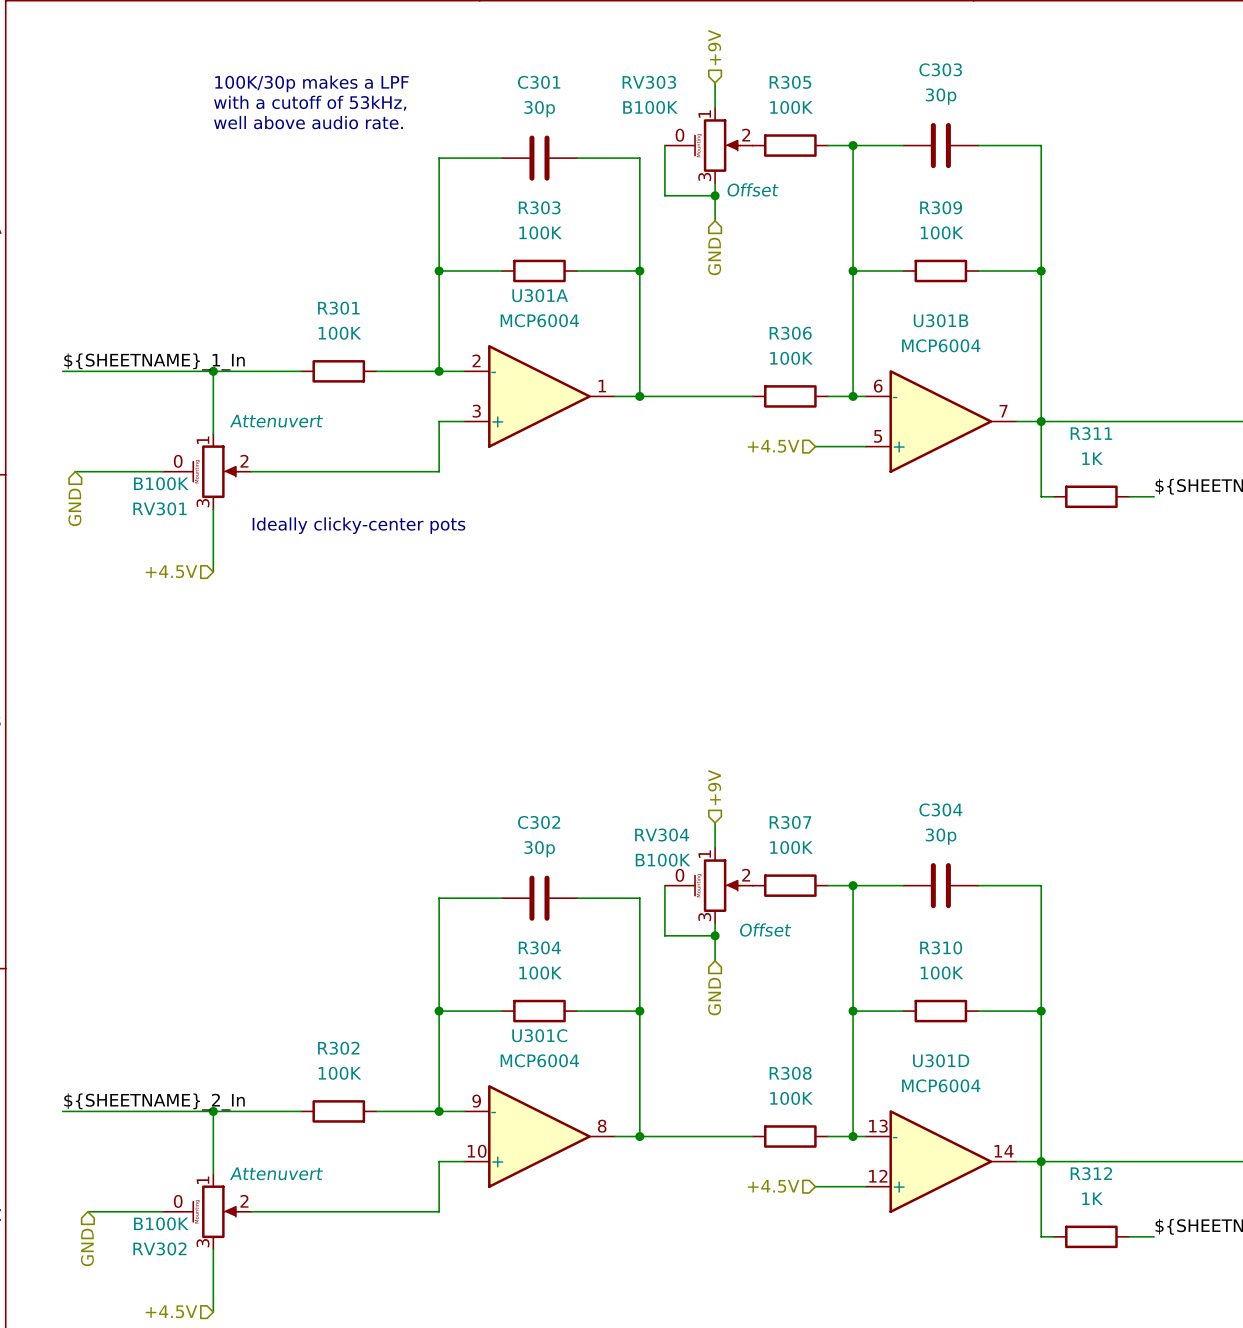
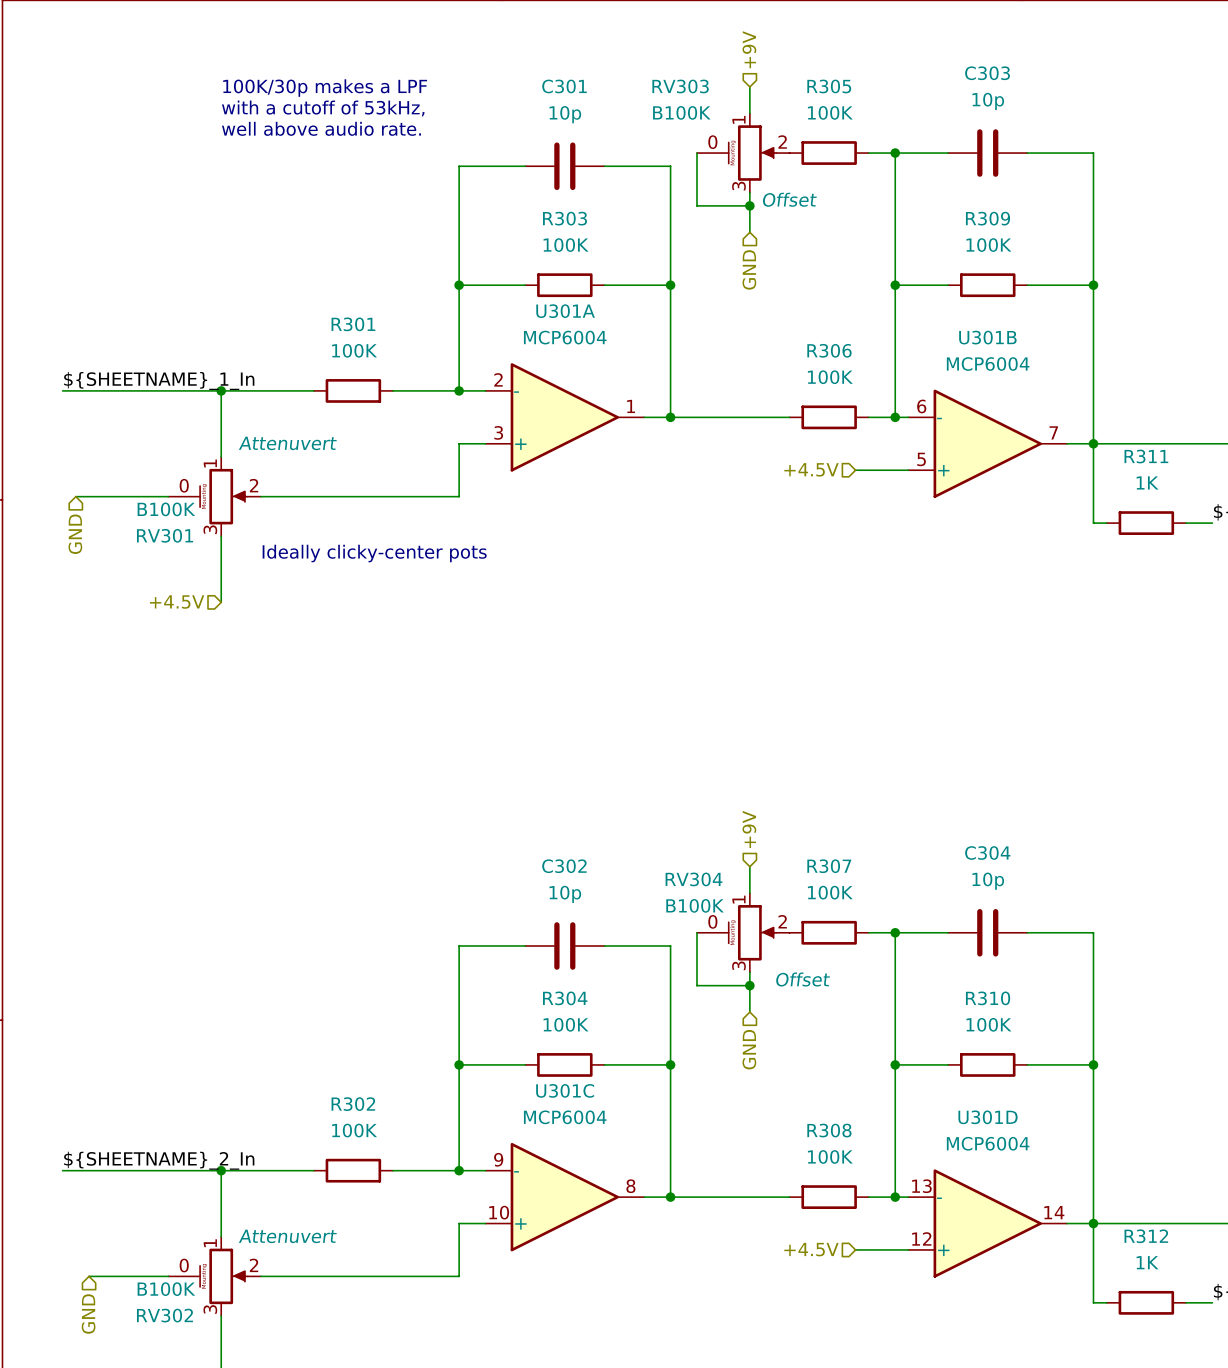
C303 value: 30p (941, 96) -> 10p (988, 101)
C301 value: 30p (539, 109) -> 10p (565, 114)
C304 value: 30p (941, 836) -> 10p (988, 881)
C302 value: 30p (539, 849) -> 10p (565, 894)

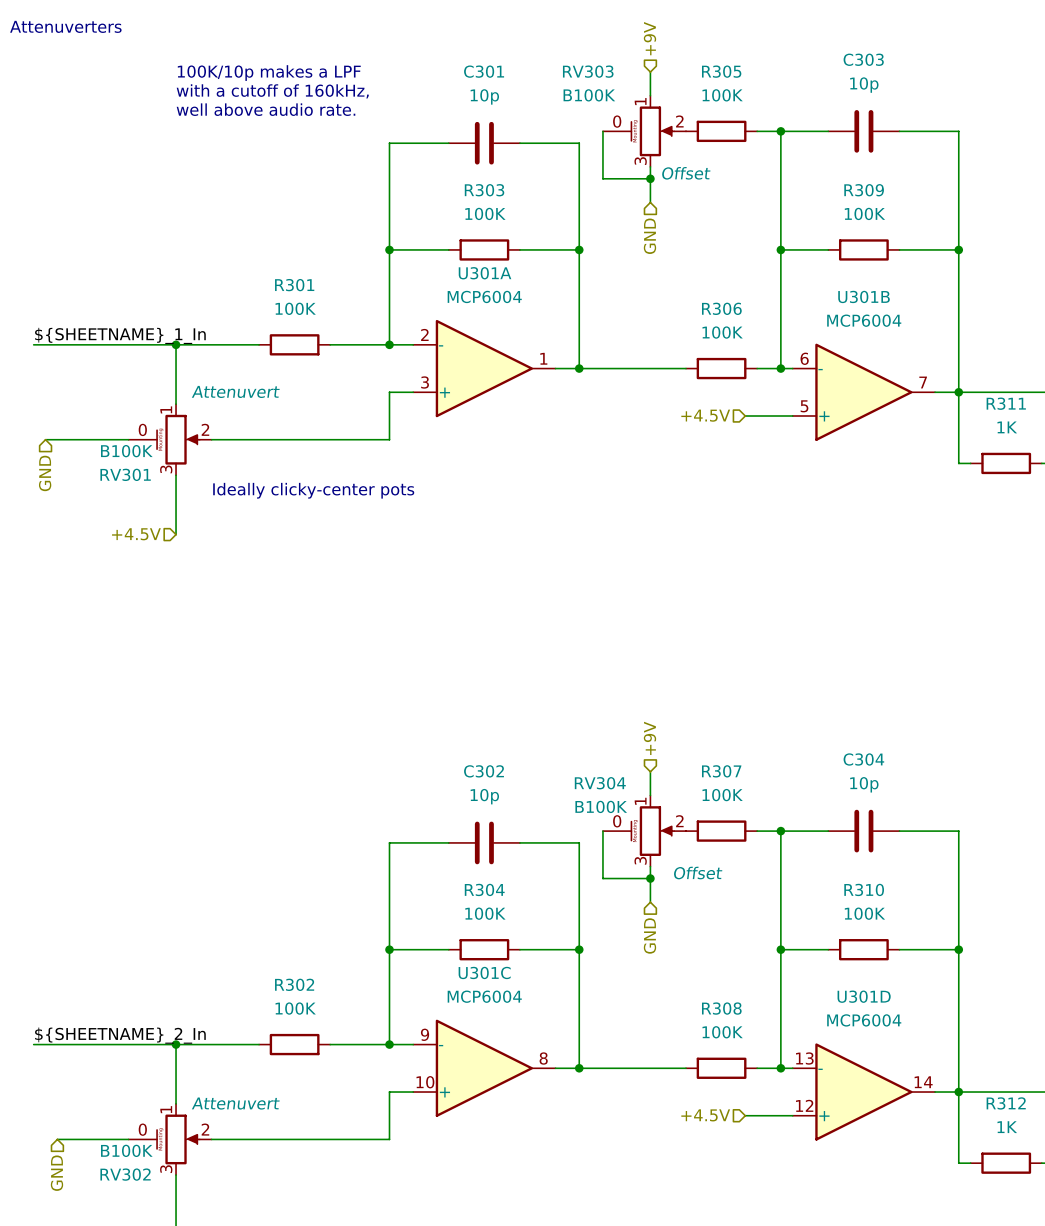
text: none -> Attenuverters (65, 26)
text: 100K/30p makes a LPF (325, 88) -> 100K/10p makes a LPF (269, 73)
text: with a cutoff of 53kHz, (323, 108) -> with a cutoff of 160kHz, (272, 91)

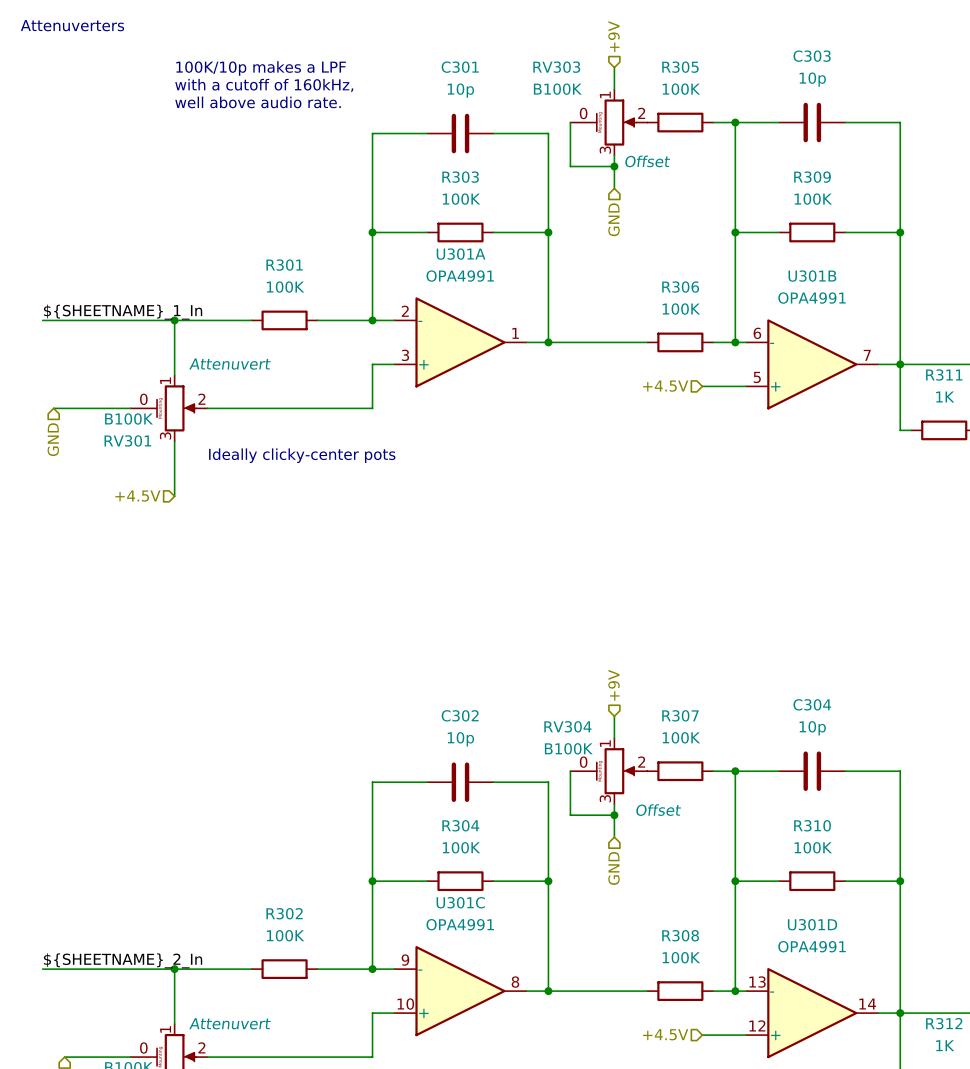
U301A value: MCP6004 (484, 296) -> OPA4991 (460, 276)
U301B value: MCP6004 (864, 320) -> OPA4991 (812, 298)
U301C value: MCP6004 (484, 996) -> OPA4991 (460, 924)
U301D value: MCP6004 (864, 1020) -> OPA4991 (812, 946)

